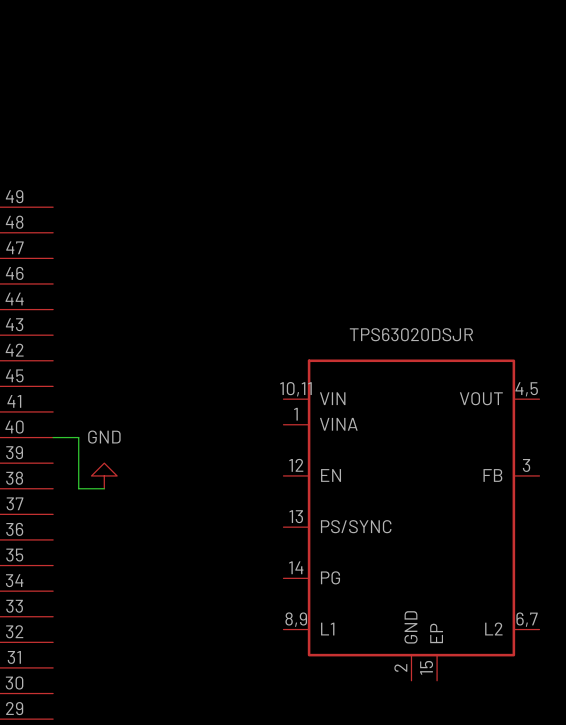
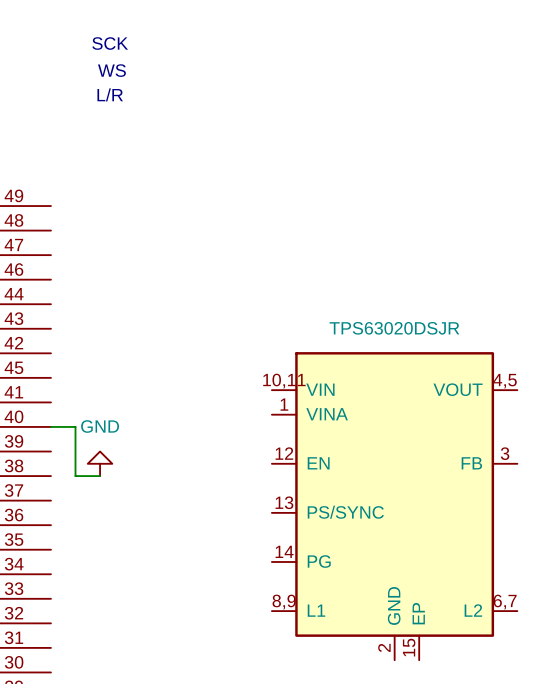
text: none -> SCK (110, 43)
text: none -> WS (111, 70)
text: none -> L/R (110, 94)

